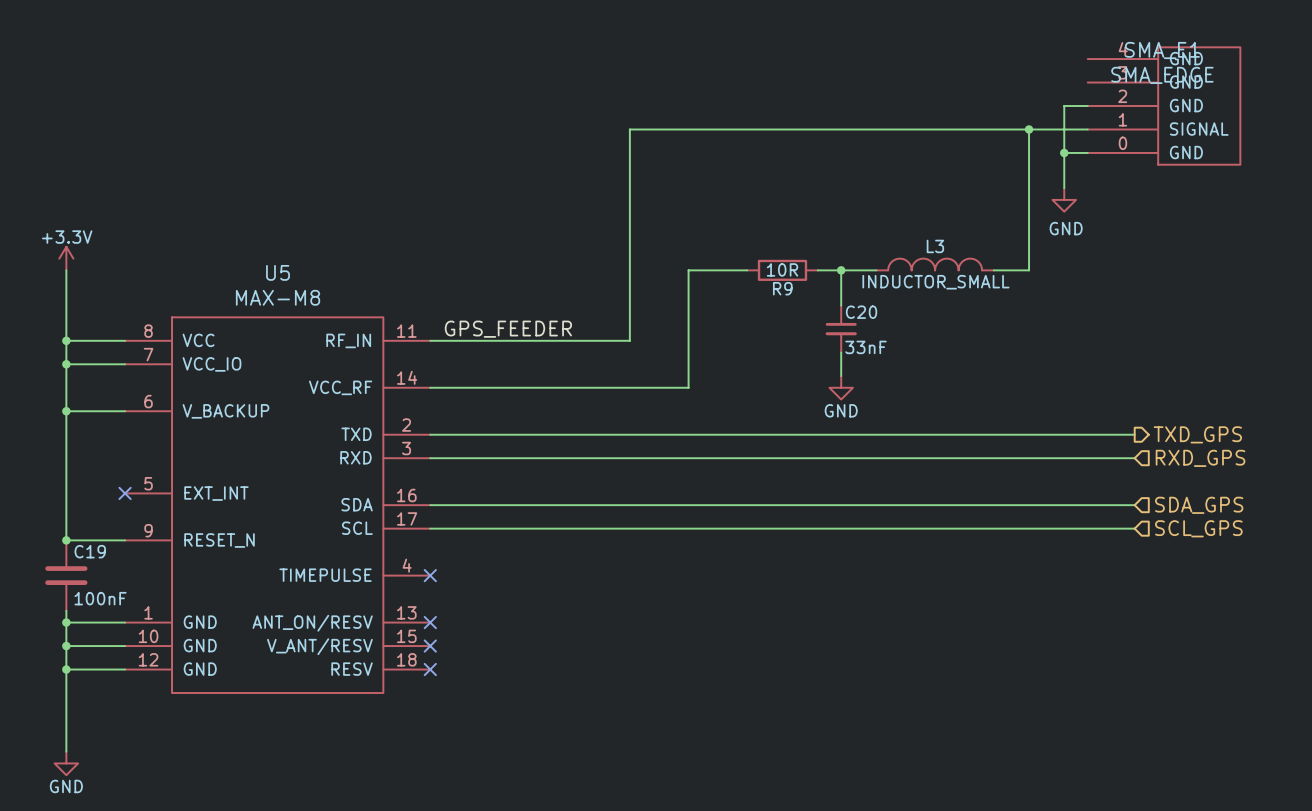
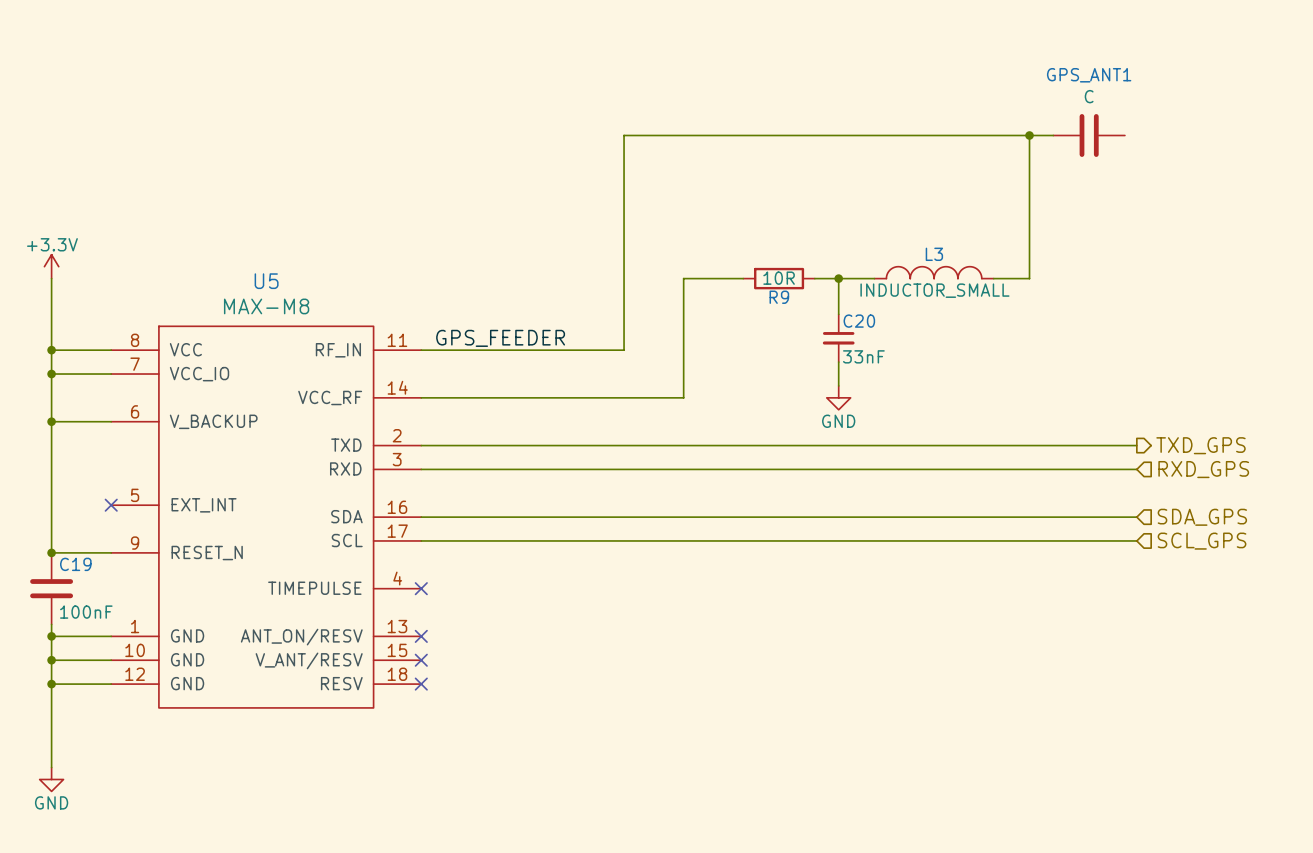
wire: (1087, 106) (1064, 106) (1064, 188) -> none
SMA_E1: SMA_EDGE (1164, 106) -> none
GPS_ANT1: none -> C (1089, 135)
wire: (1064, 152) (1087, 152) -> none
junction: (1064, 152) -> none
power symbol: GND (1064, 199) -> none

